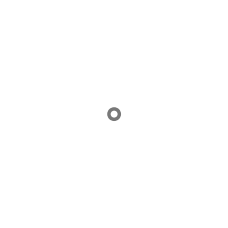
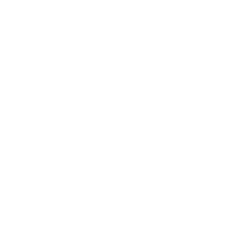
via: (114, 114) -> none

